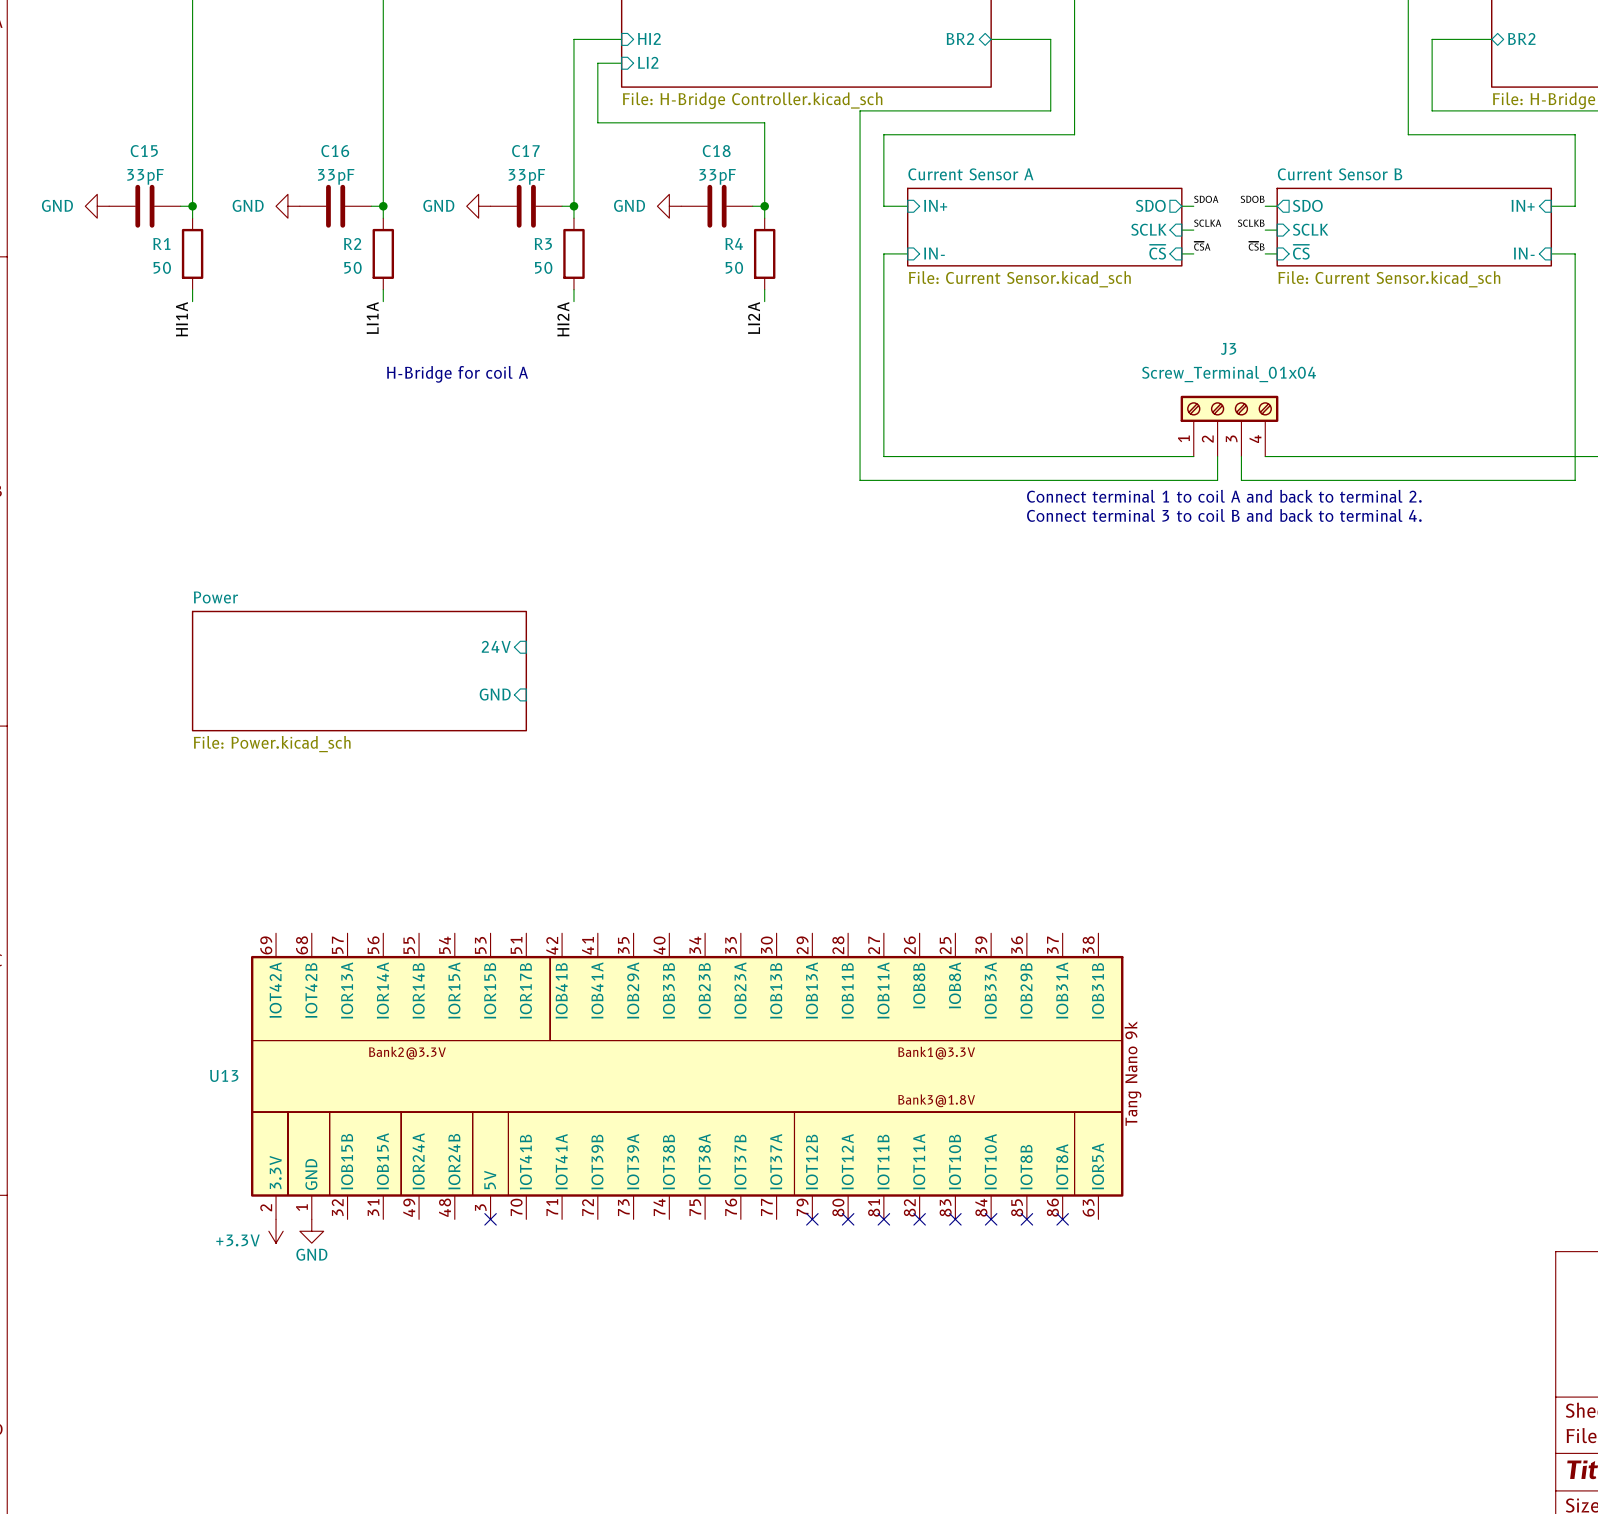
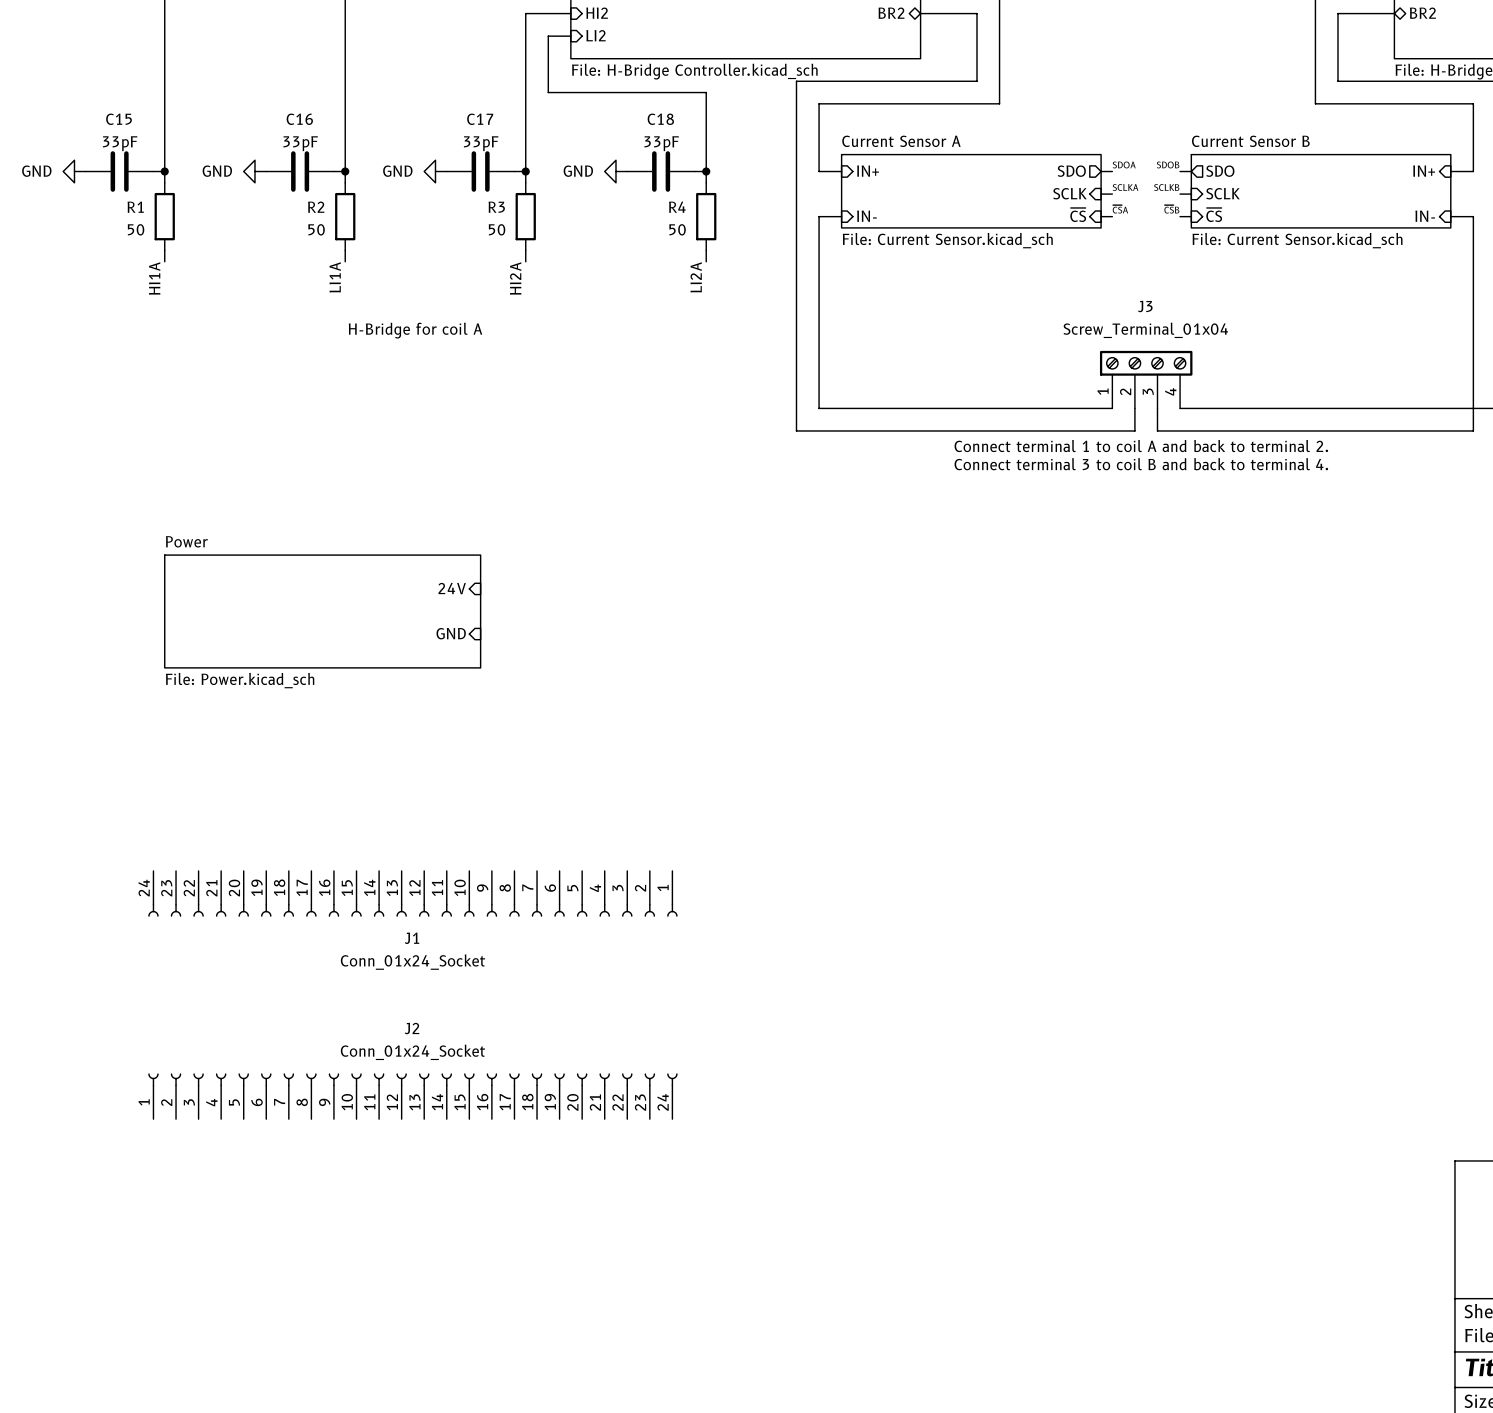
J1: none -> Conn_01x24_Socket (412, 893)
U13: (687, 1076) -> none
J2: none -> Conn_01x24_Socket (412, 1096)
no-connect mark: (490, 1219) -> none
no-connect mark: (812, 1219) -> none
no-connect mark: (848, 1219) -> none
no-connect mark: (883, 1219) -> none
no-connect mark: (919, 1219) -> none
no-connect mark: (955, 1219) -> none
no-connect mark: (991, 1219) -> none
no-connect mark: (1026, 1219) -> none
no-connect mark: (1062, 1219) -> none
power symbol: +3.3V (276, 1231) -> none
power symbol: GND (311, 1231) -> none

